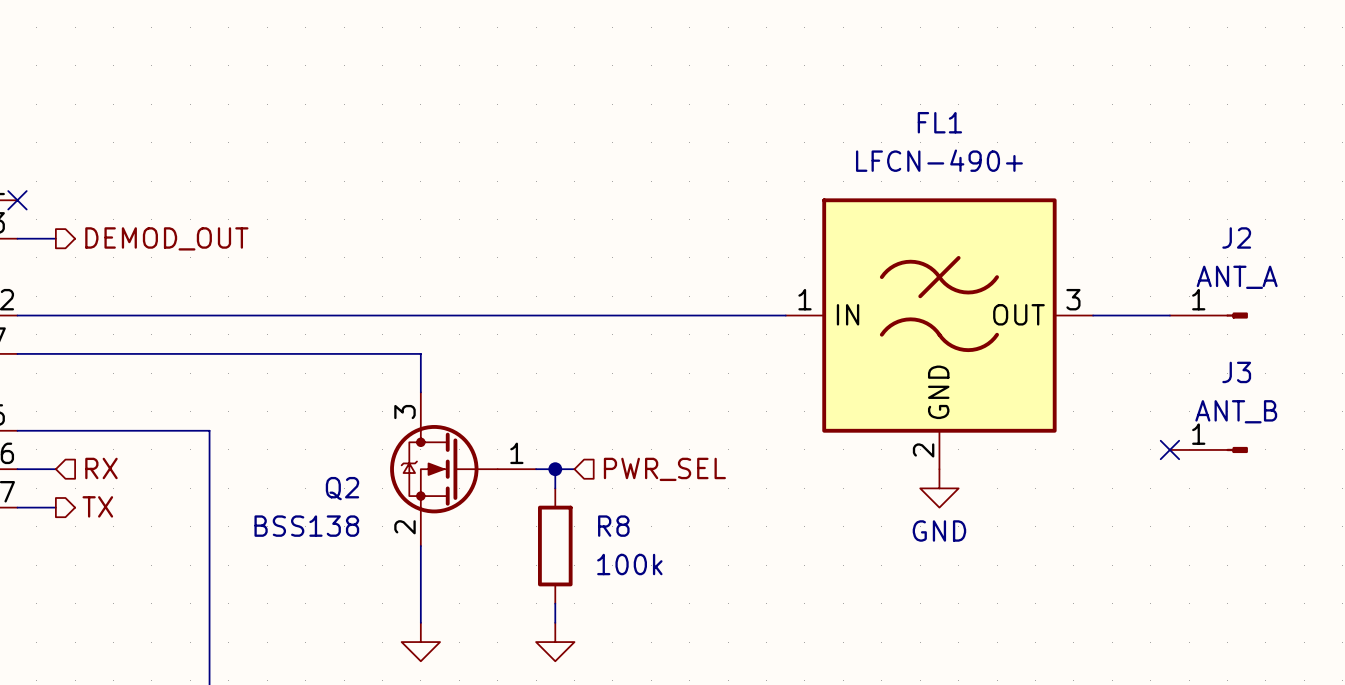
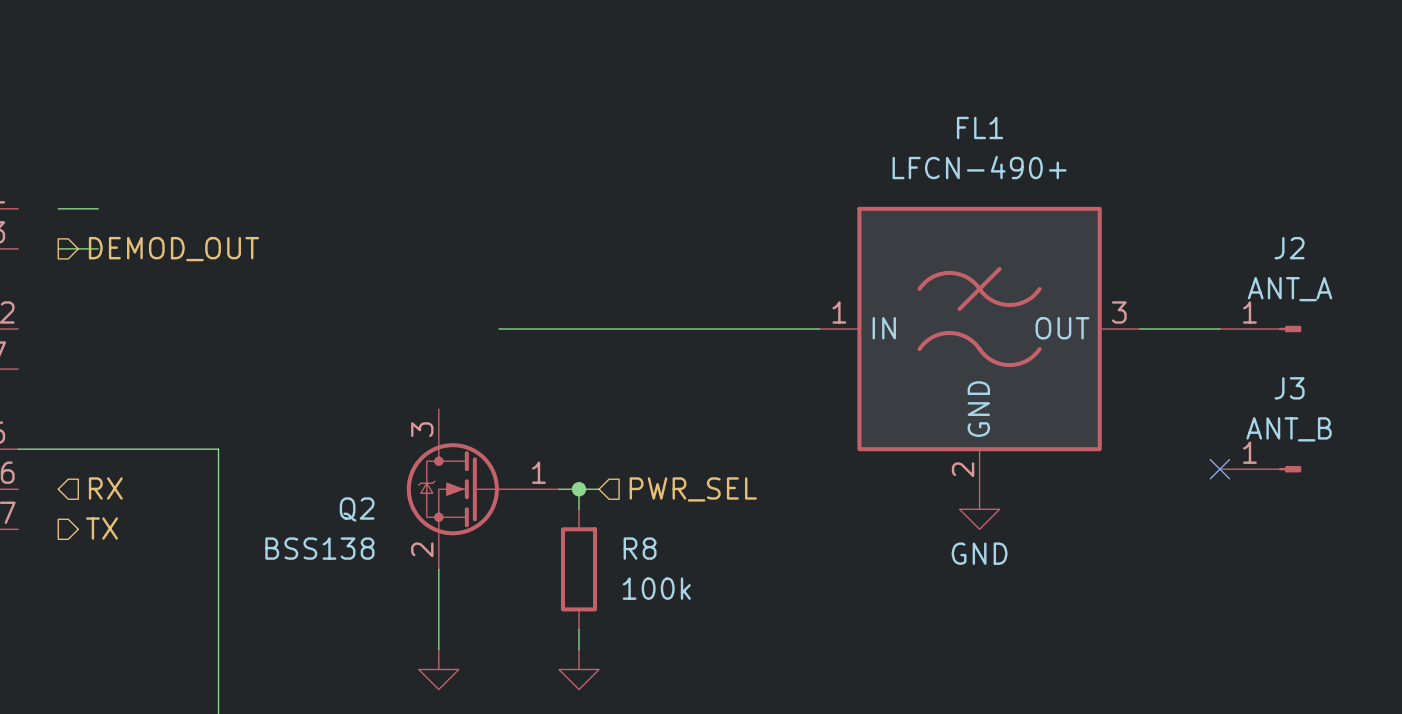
no-connect mark: (17, 200) -> none
wire: (17, 238) (55, 238) -> (98, 248) (58, 248)
wire: (17, 315) (478, 315) -> none
wire: (17, 353) (420, 353) (420, 392) -> none
wire: (17, 469) (55, 469) -> (58, 208) (98, 208)
wire: (17, 507) (55, 507) -> none

